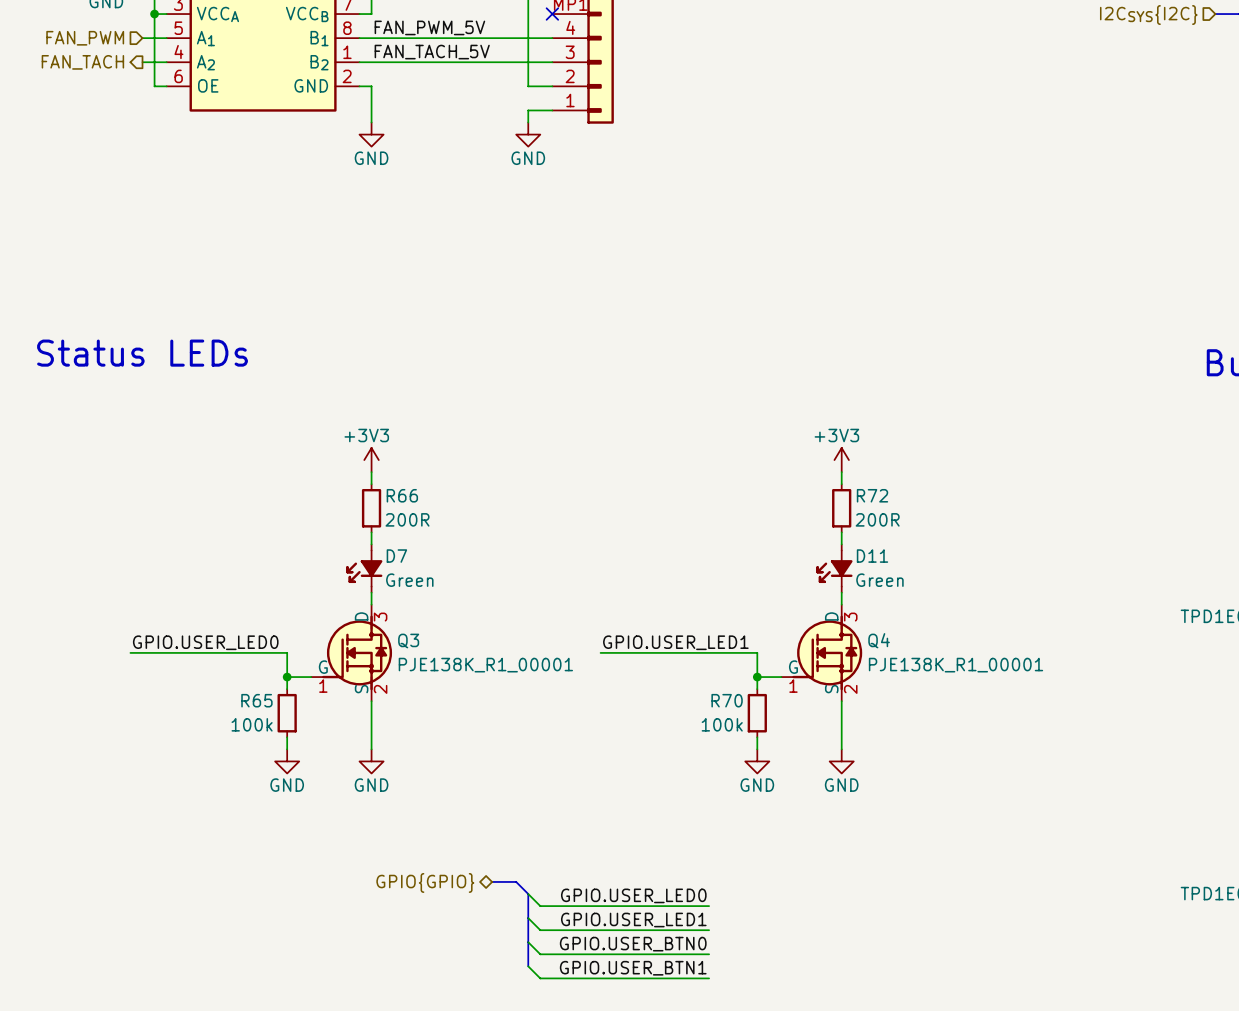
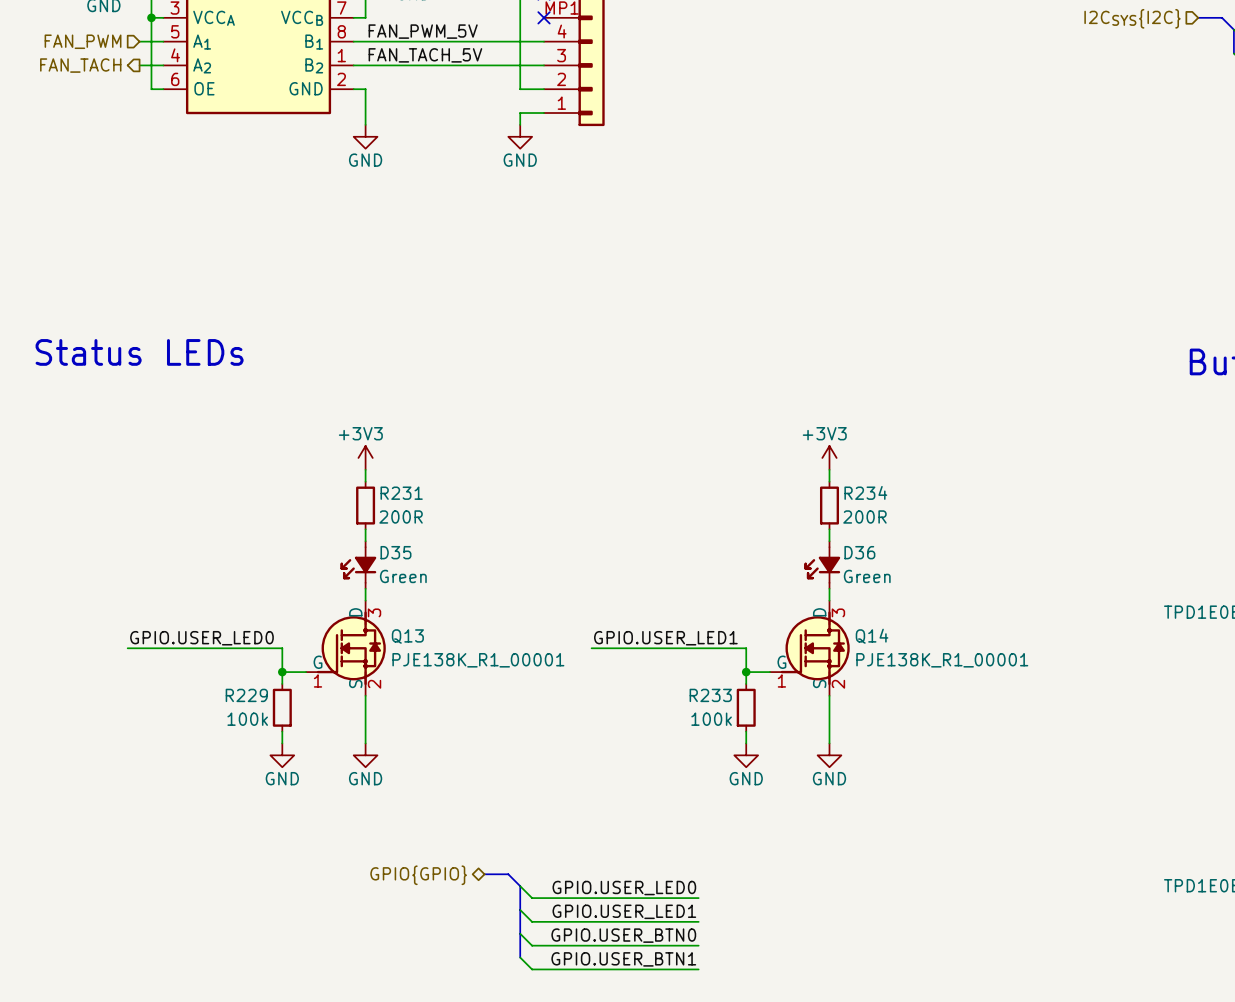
R66 name: R66 (402, 495) -> R231 (401, 493)
R72 name: R72 (872, 495) -> R234 (865, 492)
D7 name: D7 (396, 556) -> D35 (395, 552)
D11 name: D11 (872, 556) -> D36 (859, 552)
Q4 name: Q4 (879, 640) -> Q14 (872, 636)
Q3 name: Q3 (408, 641) -> Q13 (407, 636)
R65 name: R65 (256, 700) -> R229 (246, 695)
R70 name: R70 (727, 700) -> R233 (710, 695)

